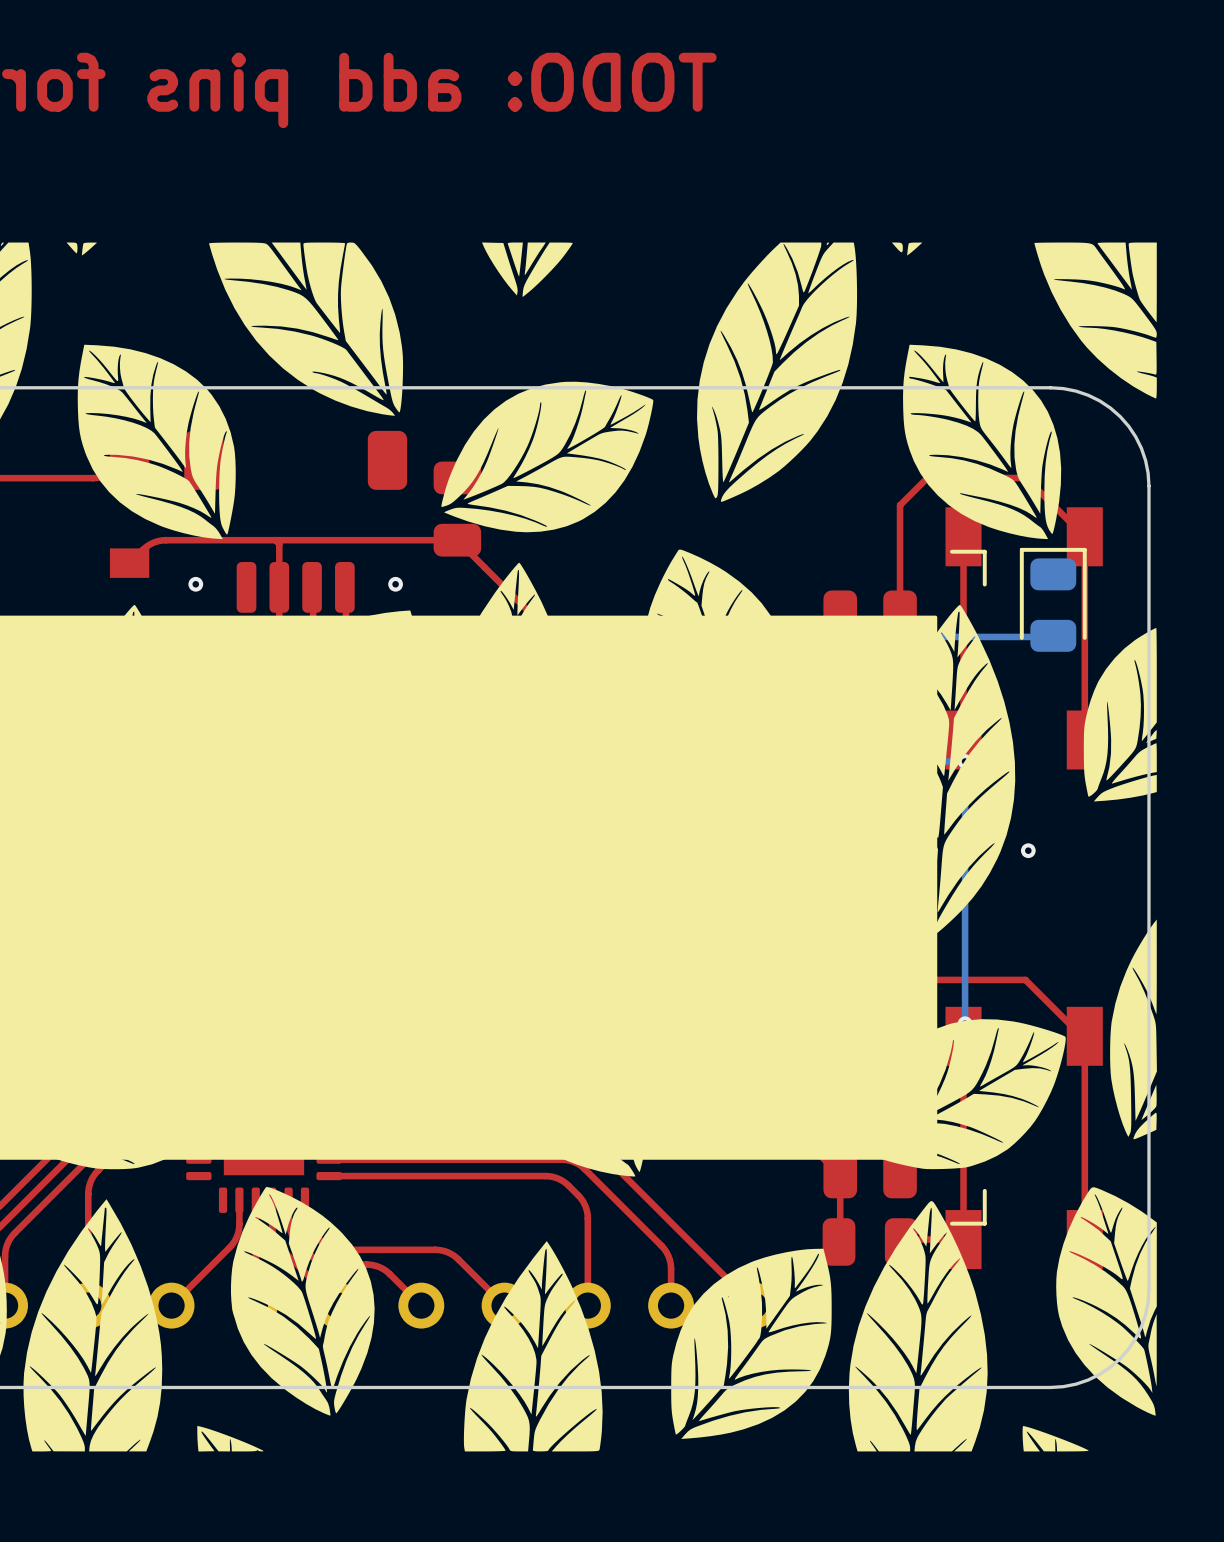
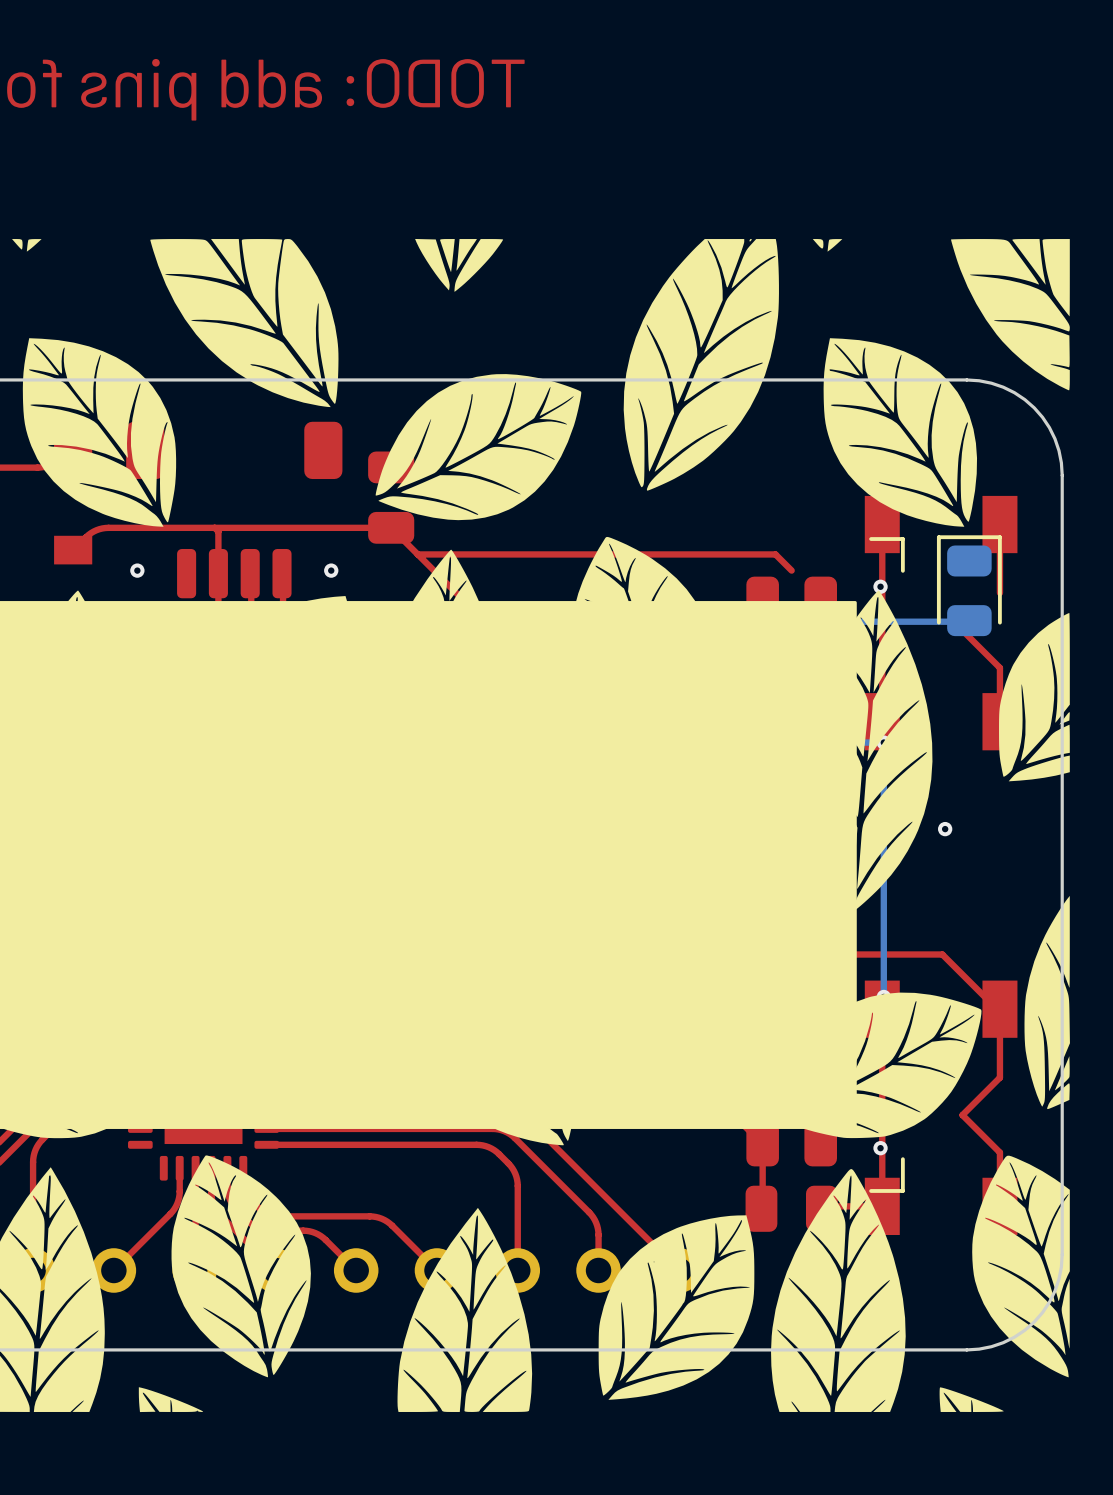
top track: (1084, 536) (1025, 477) (927, 477) (900, 505) (900, 613) -> none
top track: none -> (417, 554) (775, 554) (791, 570)
via: none -> (880, 586)
top track: (1084, 607) (1084, 684) -> (962, 630) (999, 667)
top track: (1084, 1106) (1084, 1184) -> (999, 1077) (962, 1115) (999, 1152)
via: none -> (880, 1148)

